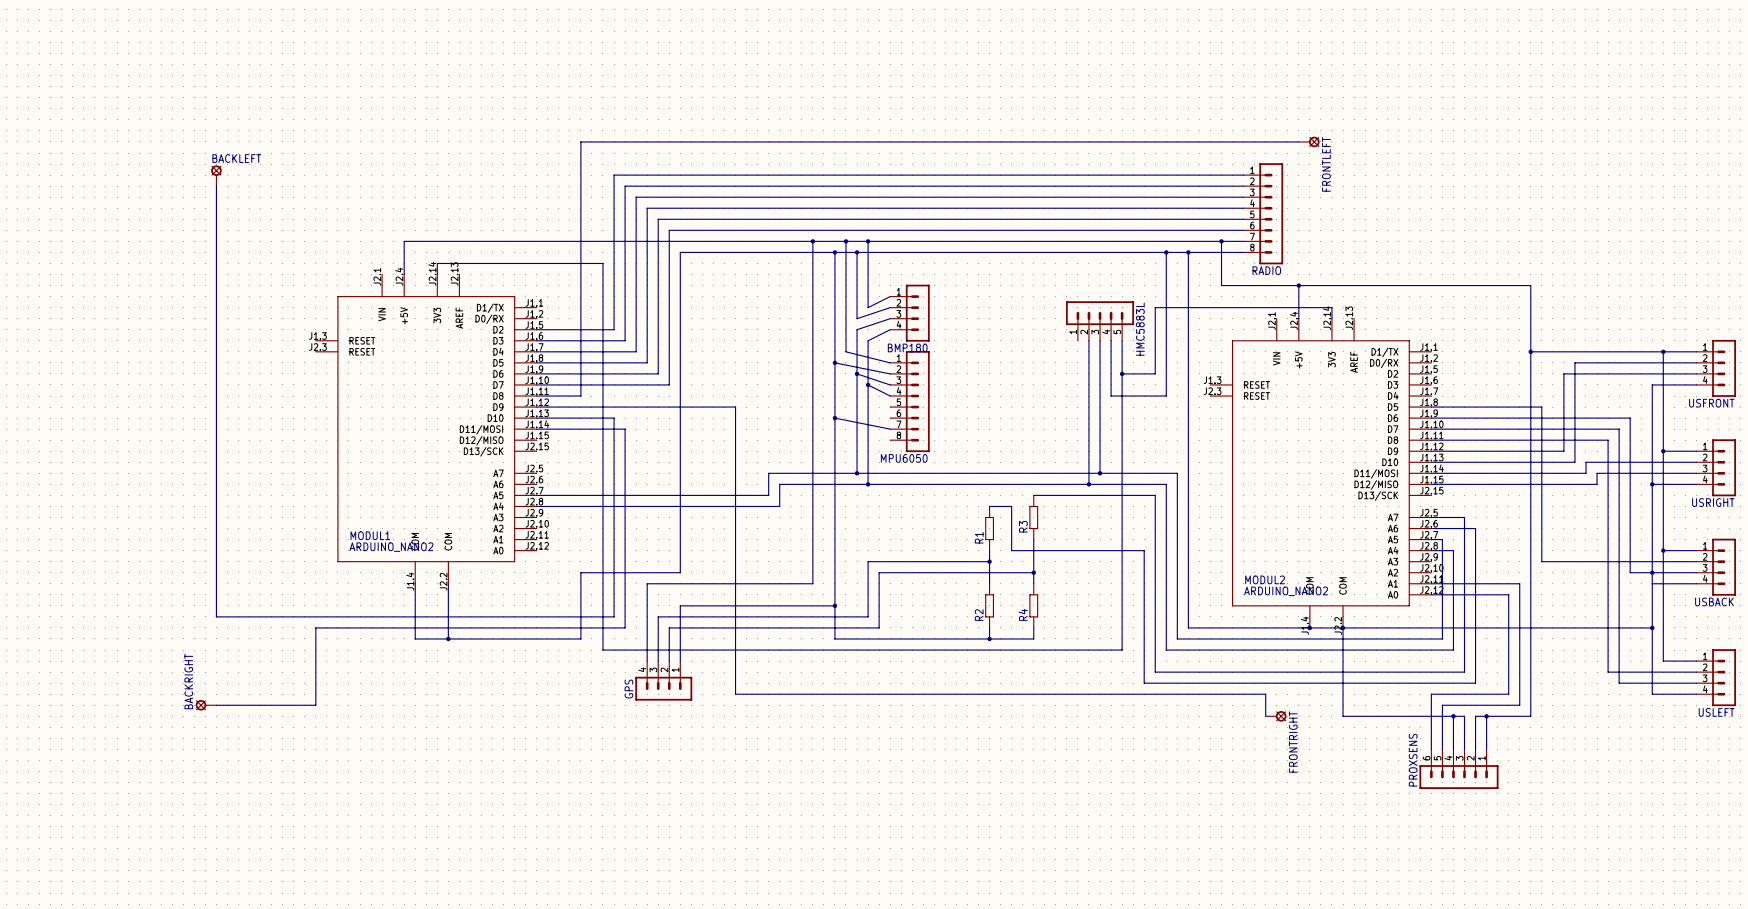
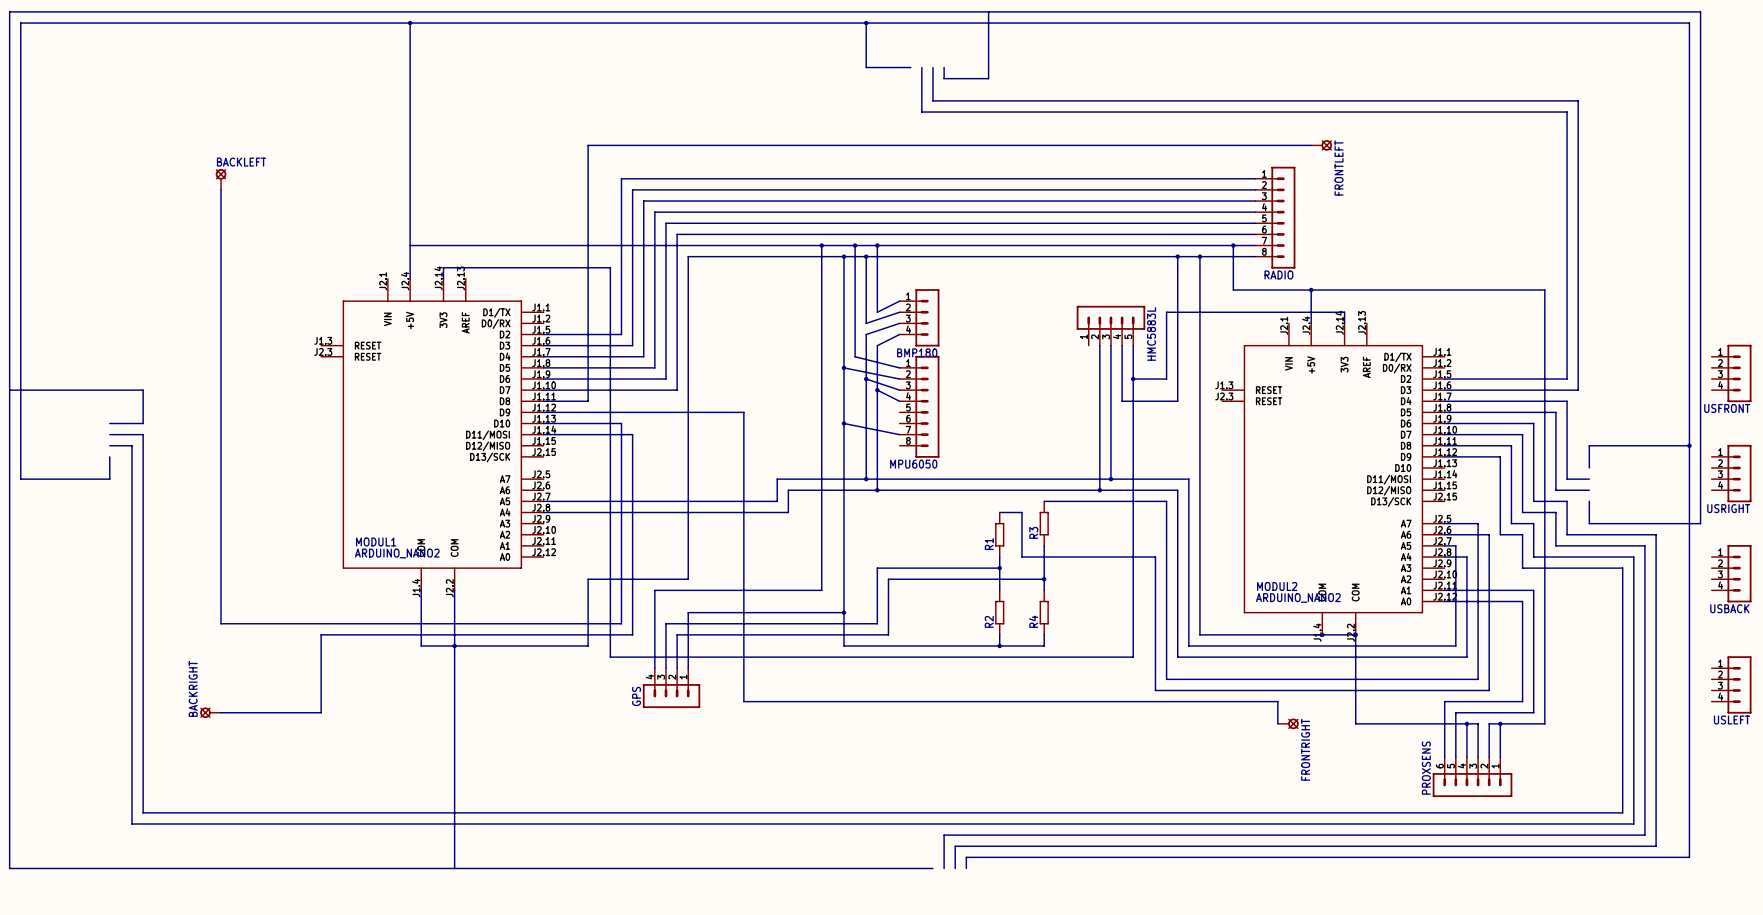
wire: none -> (988, 11) (988, 78) (944, 78) (944, 67)
wire: none -> (410, 23) (410, 245)
junction: none -> (410, 23)
wire: none -> (866, 23) (866, 67) (910, 67)
junction: none -> (866, 23)
wire: none -> (921, 67) (921, 112) (1567, 112) (1567, 379) (1444, 379)
wire: (1530, 351) (1696, 351) -> none
junction: (1530, 351) -> none
wire: (1663, 351) (1663, 661) (1696, 661) -> none
junction: (1663, 351) -> none
wire: (1696, 362) (1574, 362) (1574, 440) (1497, 440) -> none
wire: (1563, 373) (1696, 373) -> (1578, 379) (1578, 100) (932, 100) (932, 67)
wire: none -> (9, 390) (143, 390) (143, 423) (109, 423)
wire: (1563, 384) (1563, 451) (1486, 451) -> (1578, 390) (1444, 390)
wire: (1696, 384) (1652, 384) (1652, 694) (1696, 694) -> none
wire: (1519, 418) (1630, 418) (1630, 539) -> (1533, 423) (1533, 501) (1567, 501) (1567, 534) (1656, 534) (1656, 846) (955, 846) (955, 868)
wire: (1508, 429) (1619, 429) (1619, 550) -> (1511, 445) (1511, 523) (1533, 523) (1533, 557) (1633, 557)
wire: (1608, 440) (1608, 561) (1696, 561) -> (1622, 445) (1689, 445)
wire: none -> (109, 456) (109, 479) (20, 479) (20, 23) (1689, 23) (1689, 857) (966, 857) (966, 868)
wire: none -> (1500, 456) (1500, 534) (1522, 534) (1522, 568) (1555, 568)
wire: (1663, 451) (1696, 451) -> none
junction position: (1663, 451) -> (1689, 445)
wire: (1431, 462) (1574, 462) -> none
wire: (1696, 462) (1585, 462) (1585, 473) (1574, 473) -> none
wire: (1431, 473) (1552, 473) -> (1444, 401) (1567, 401) (1567, 479)
wire: (1696, 473) (1597, 473) (1597, 484) (1574, 484) -> none
wire: (1431, 484) (1541, 484) (1541, 506) -> (1522, 434) (1522, 512) (1555, 512)
wire: (1652, 484) (1696, 484) -> none
junction: (1652, 484) -> none
wire: none -> (1589, 501) (1589, 523) (1700, 523) (1700, 11) (9, 11) (9, 868) (932, 868)
wire: (1541, 539) (1541, 561) -> (1555, 545) (1644, 545)
wire: (1663, 550) (1696, 550) -> none
junction: (1663, 550) -> none
wire: (1630, 572) (1696, 572) -> (1644, 579) (1644, 835) (944, 835) (944, 868)
junction: (1652, 572) -> none
wire: (1652, 583) (1696, 583) -> none
wire: (1343, 627) (1652, 627) -> none
junction: (1652, 627) -> none
wire: none -> (454, 646) (454, 868)
wire: (1608, 672) (1696, 672) -> (1622, 679) (1622, 812) (143, 812) (143, 434) (109, 434)
wire: (1619, 683) (1696, 683) -> (1633, 690) (1633, 823) (132, 823) (132, 445) (109, 445)

